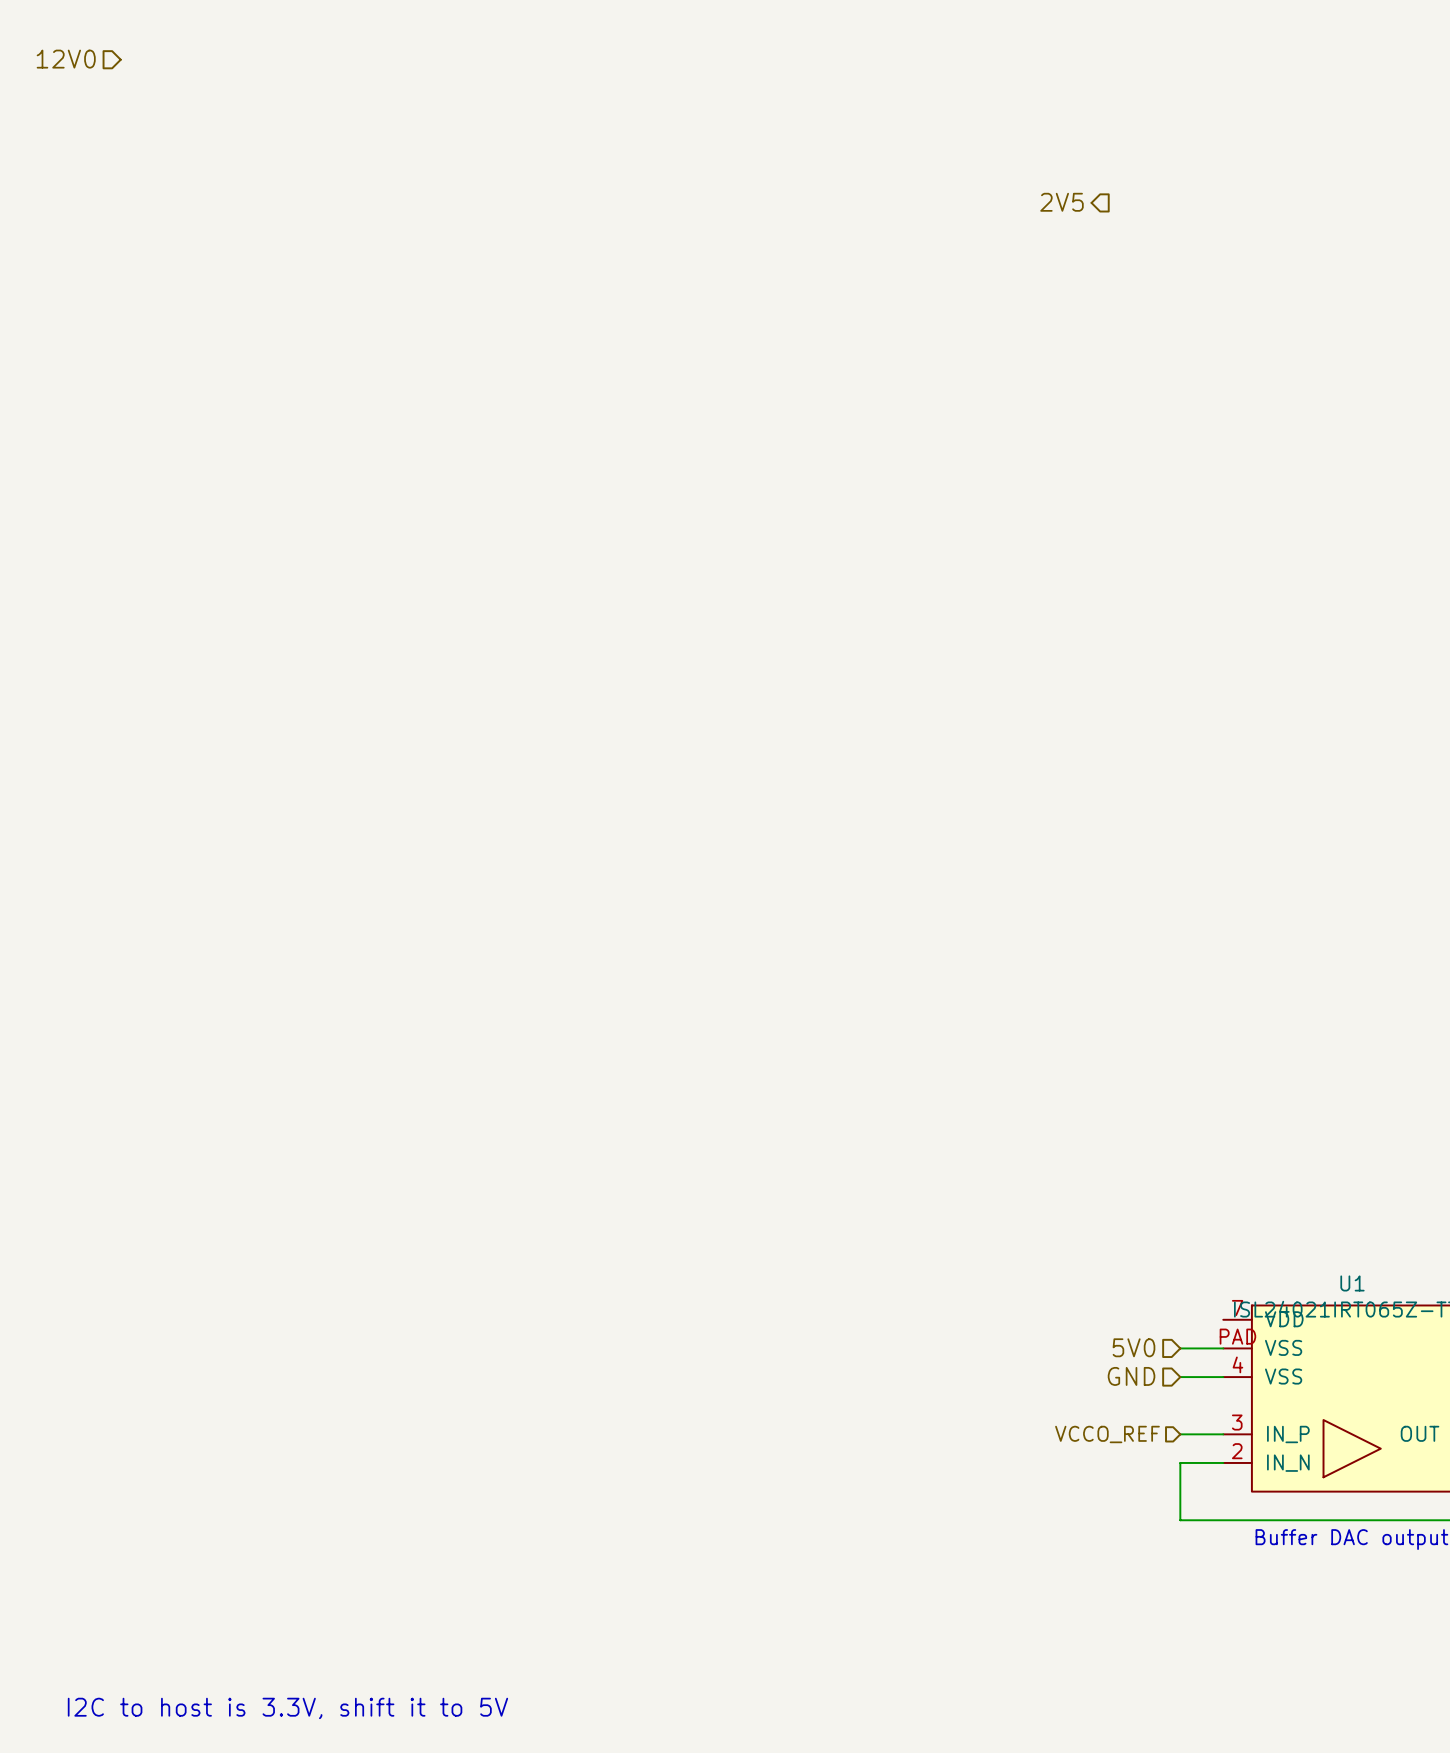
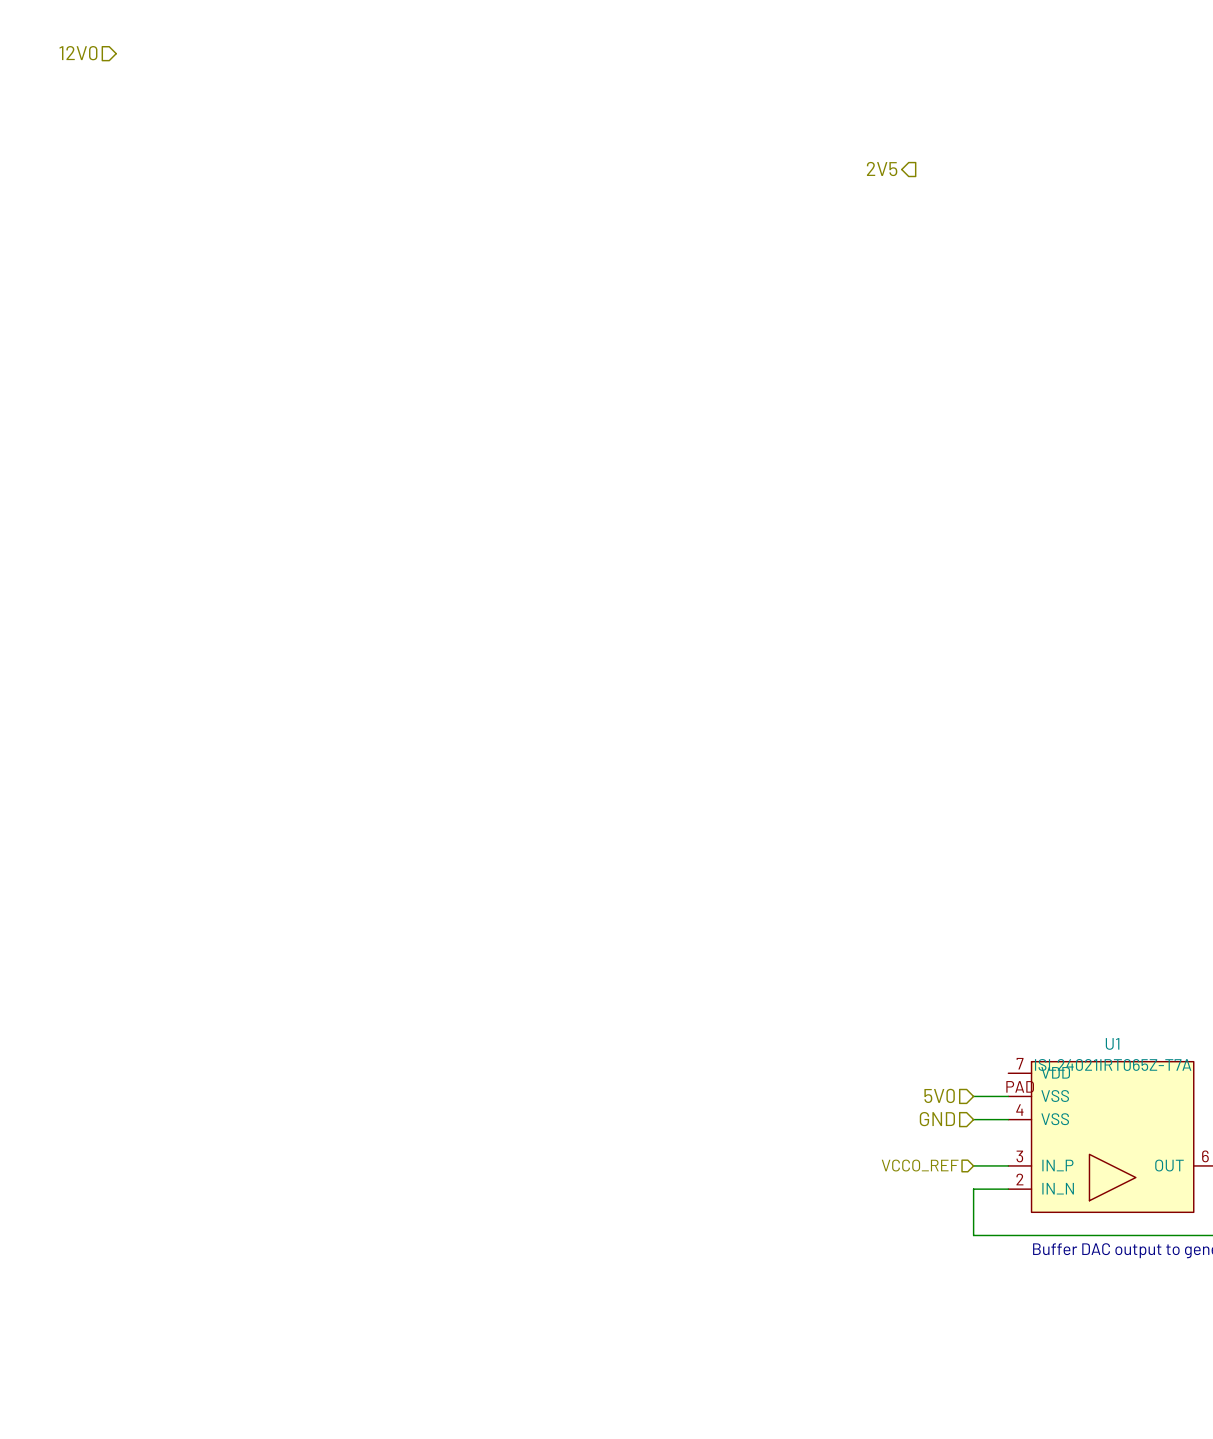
text: I2C to host is 3.3V, shift it to 5V (287, 1708) -> none

